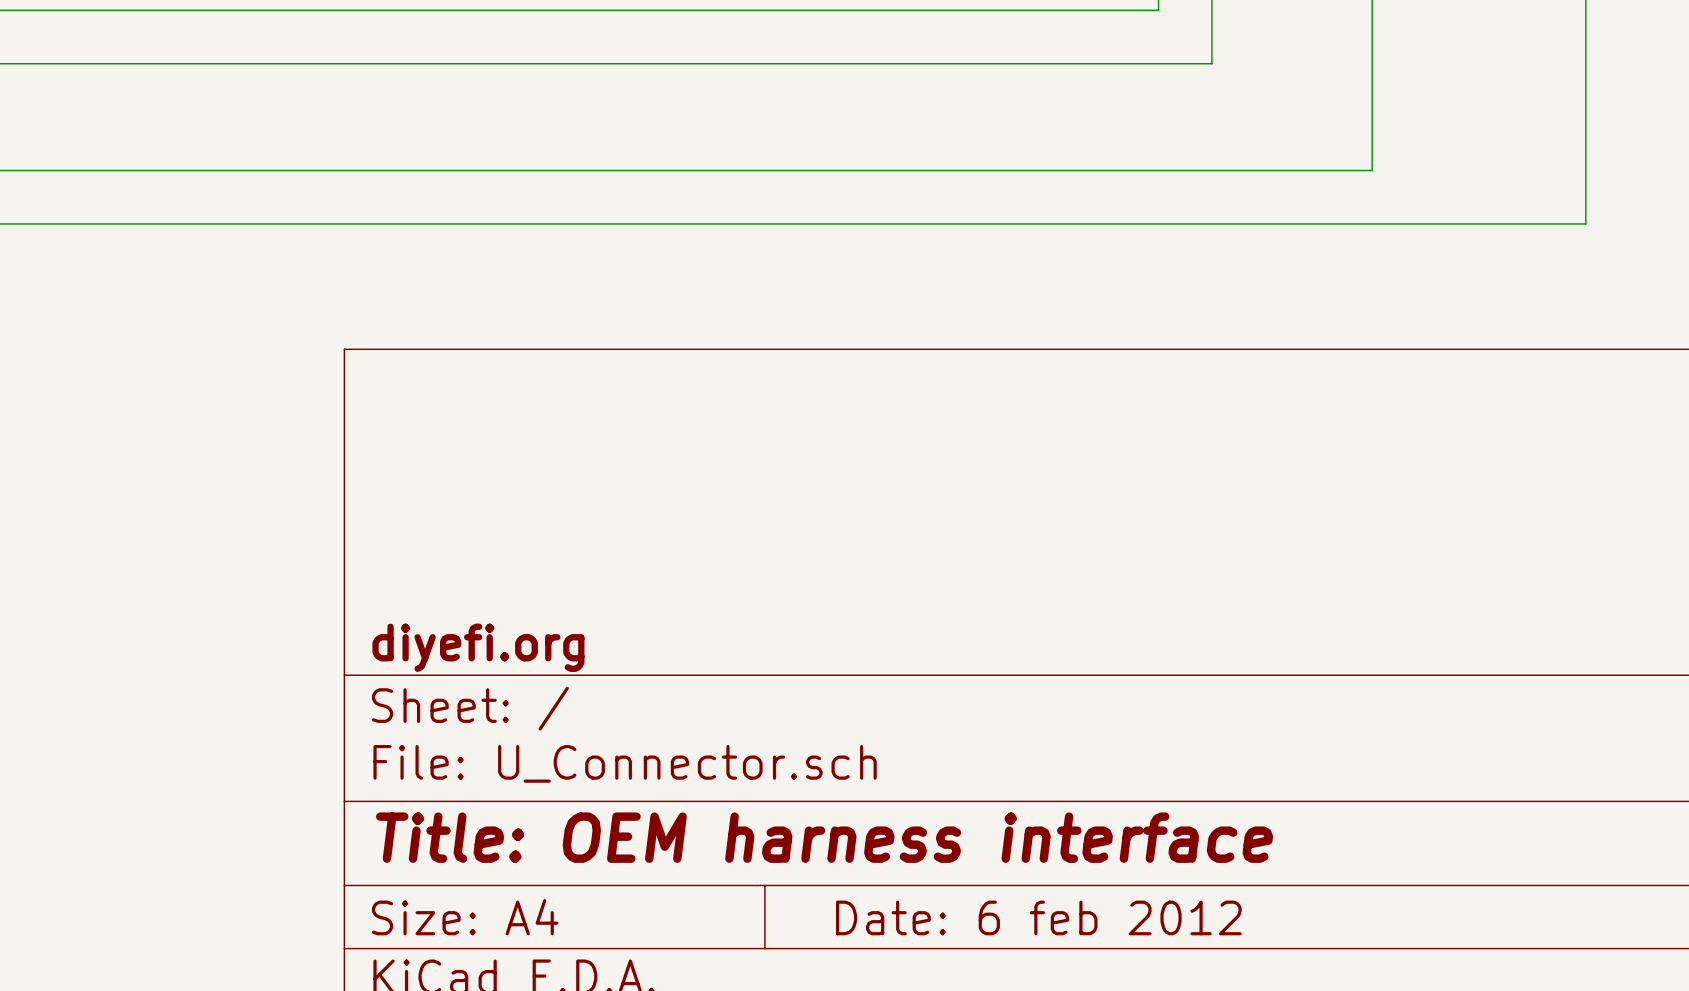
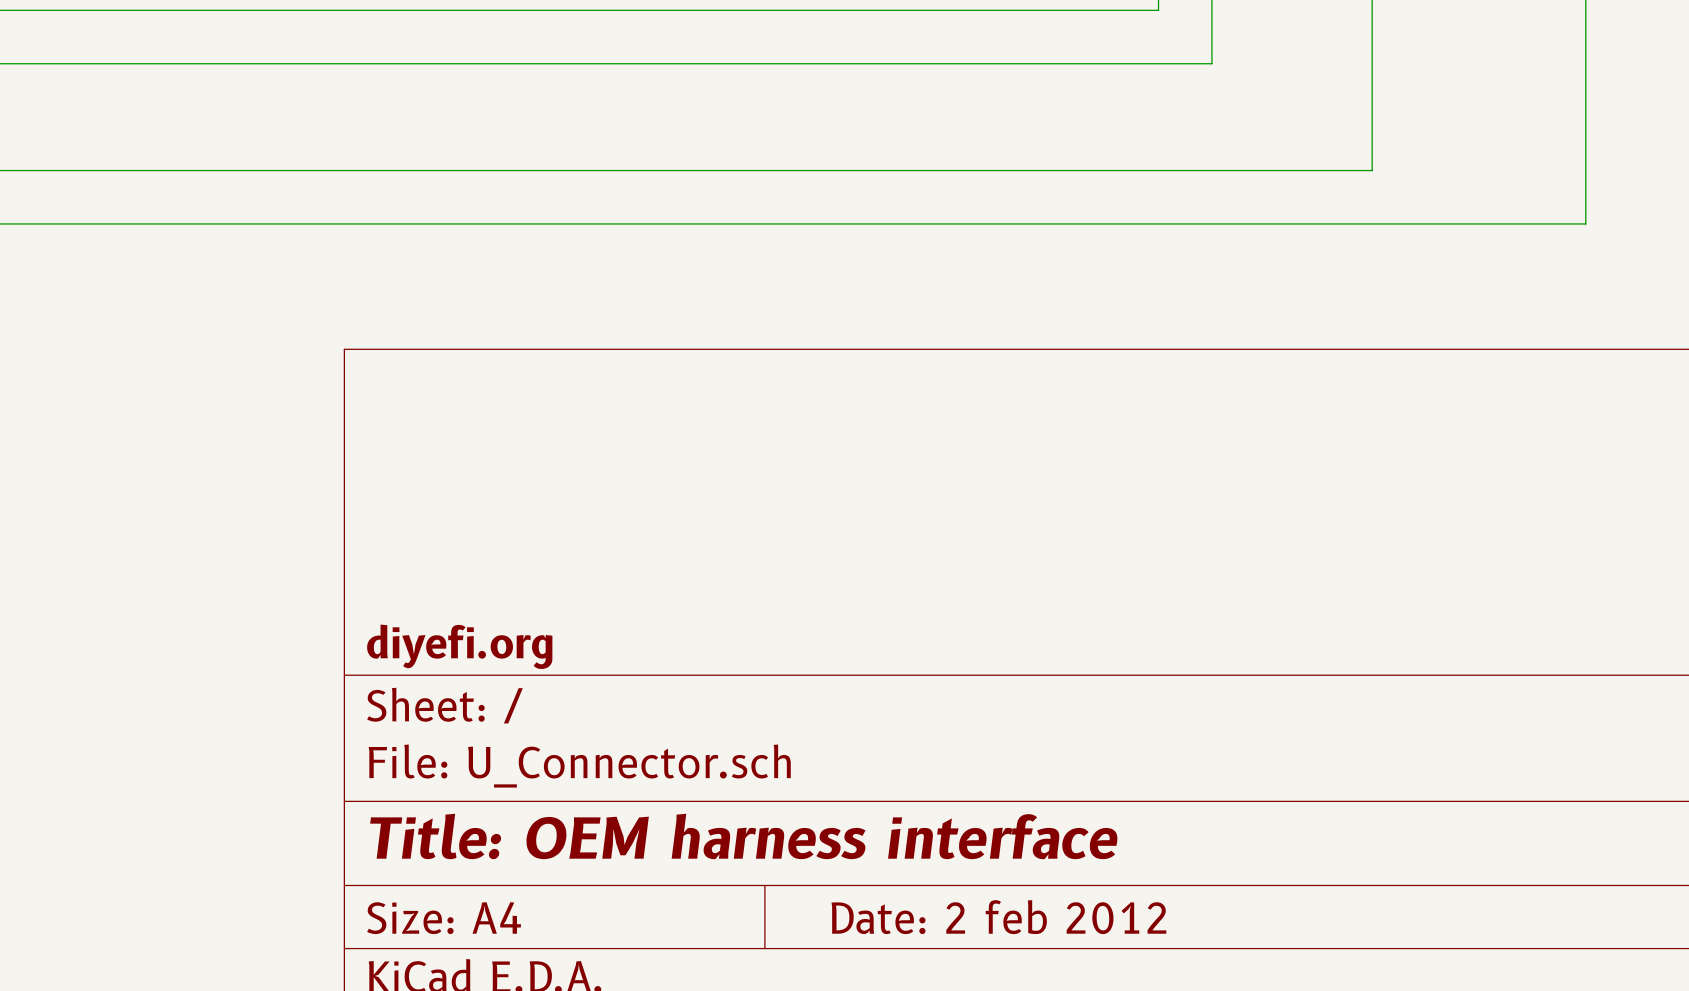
title block: Date: 6 feb 2012 (1038, 917) -> Date: 2 feb 2012 (998, 917)

